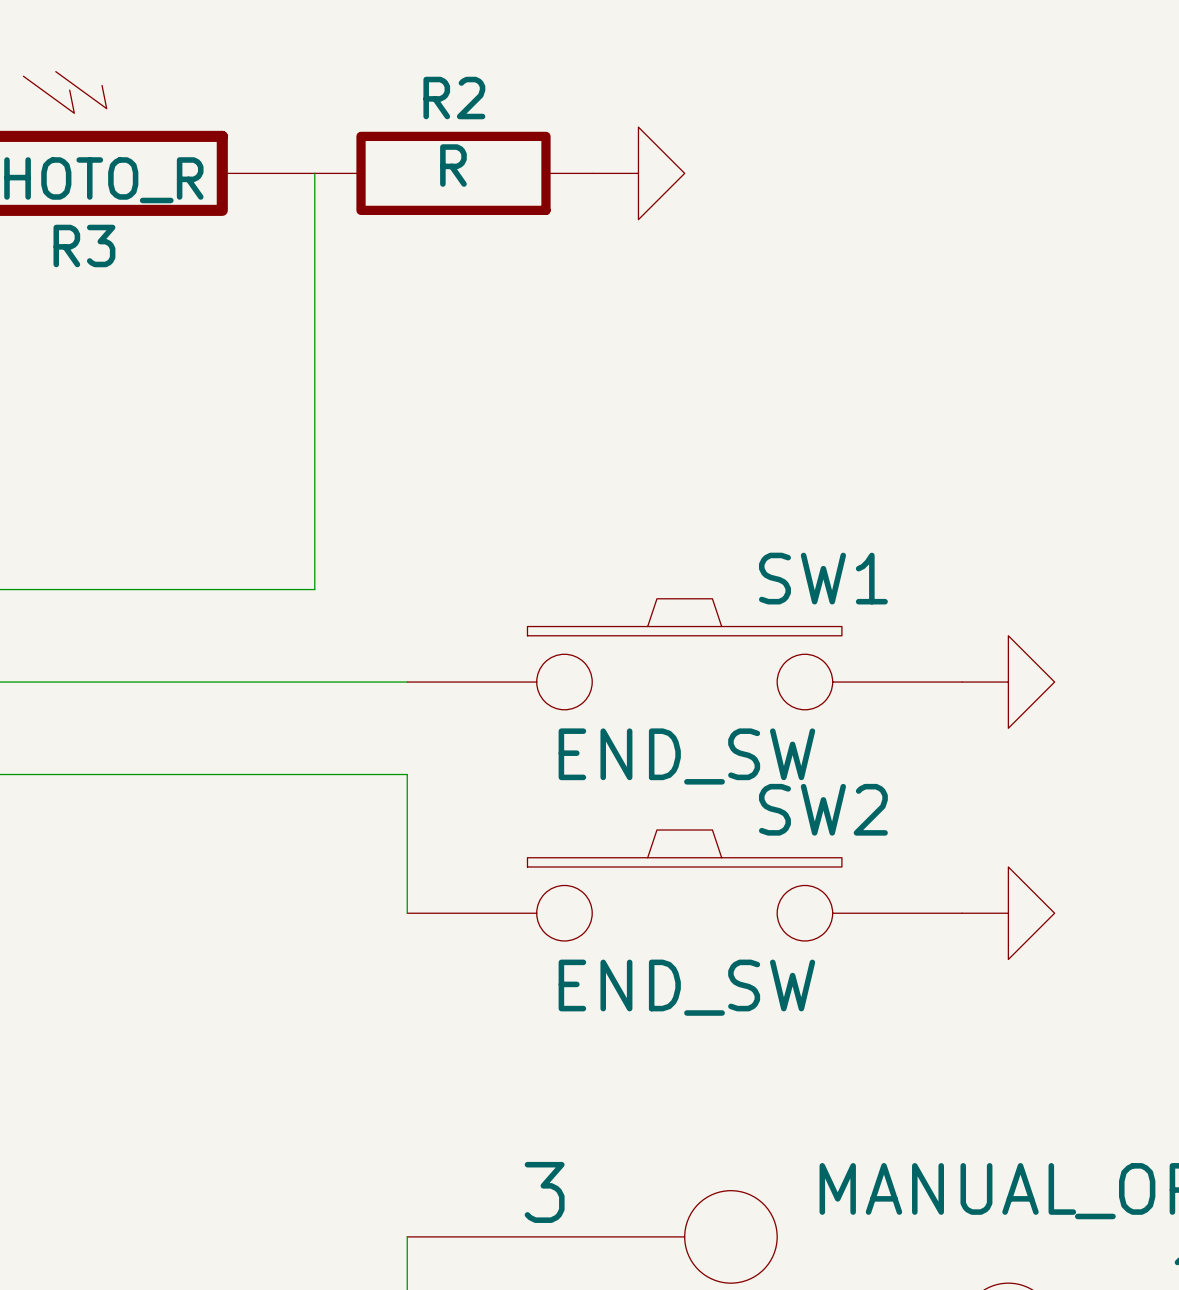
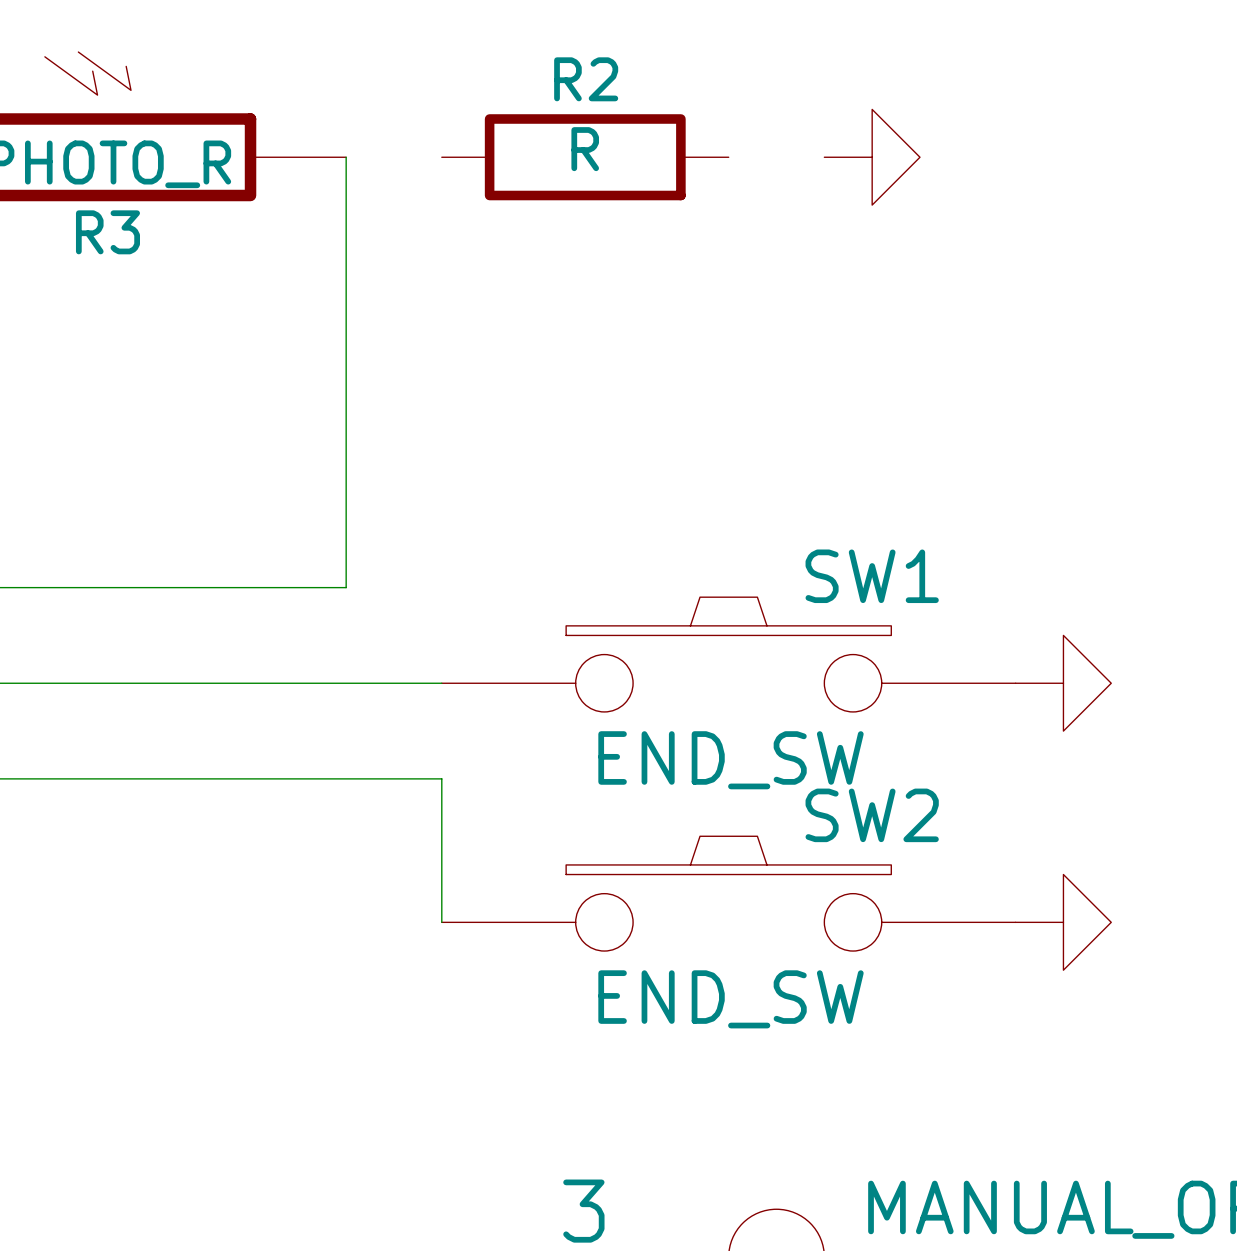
R2 position: (453, 173) -> (585, 157)
power symbol position: (638, 173) -> (872, 157)

